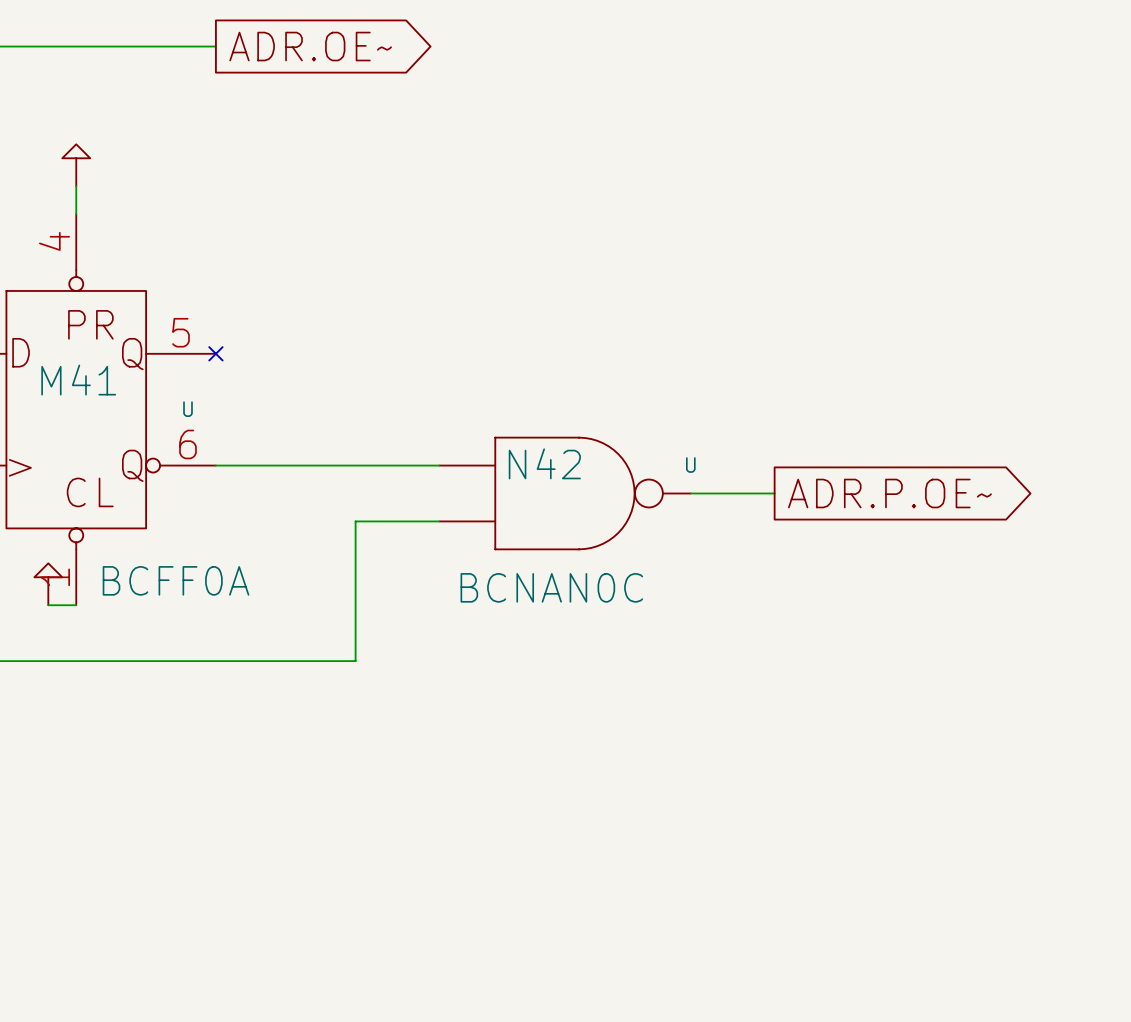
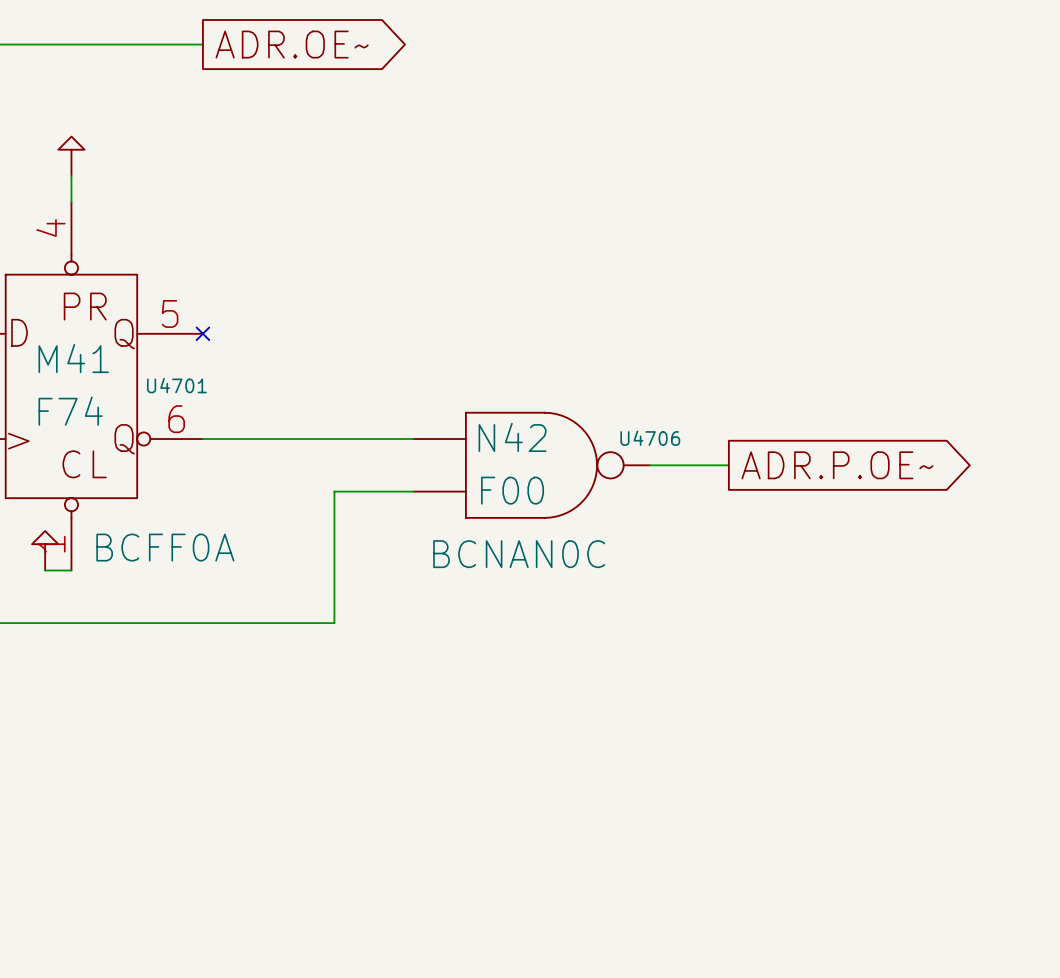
U name: U (187, 409) -> U4701 (176, 385)
U value: none -> F74 (70, 411)
U name: U (690, 465) -> U4706 (650, 438)
U value: none -> F00 (512, 490)

